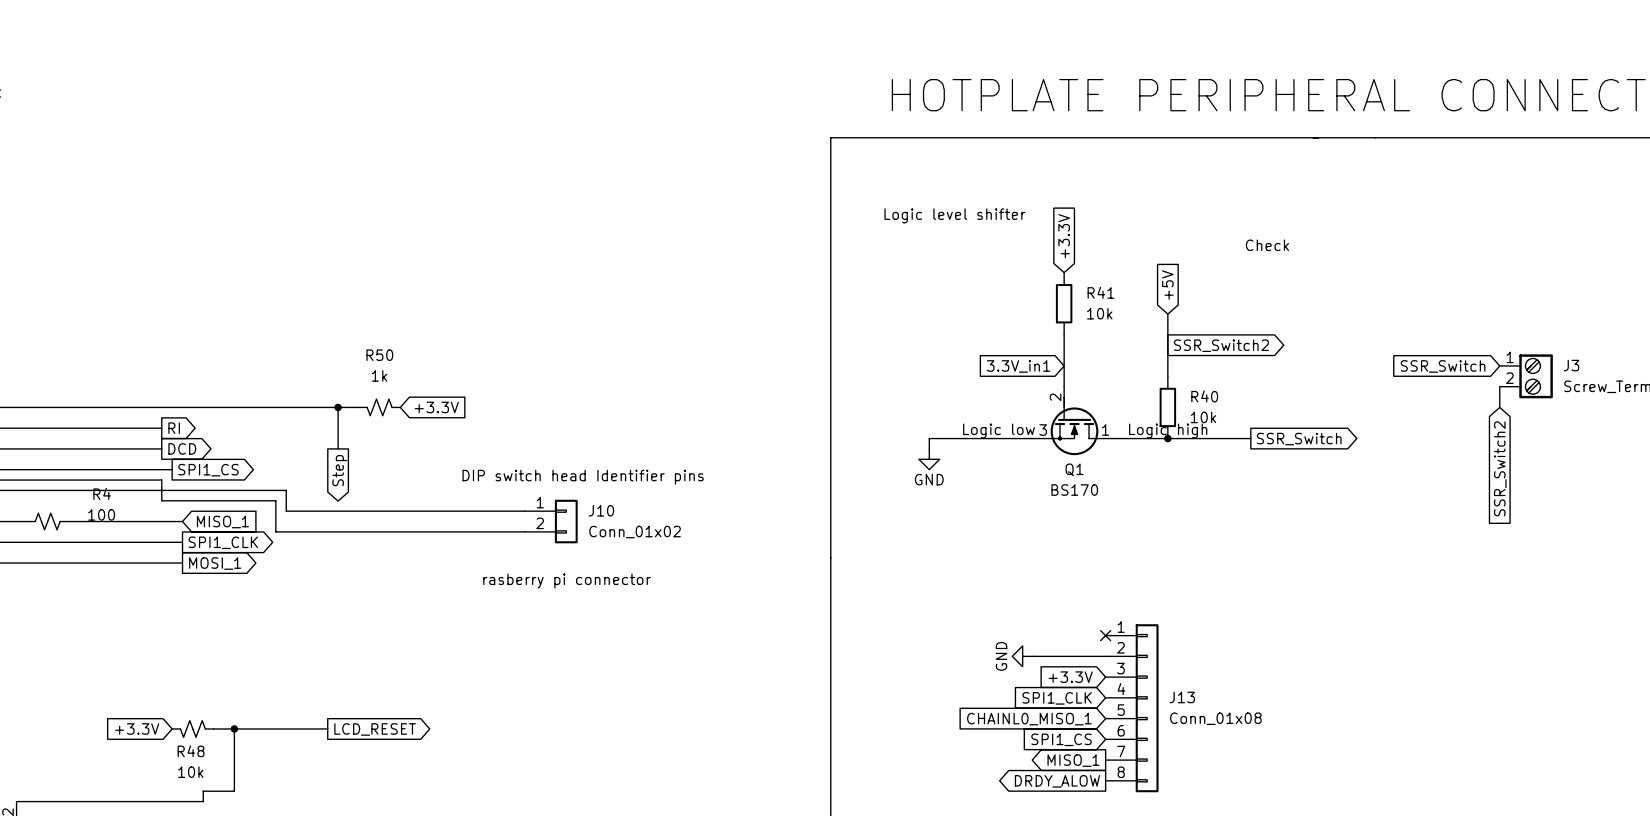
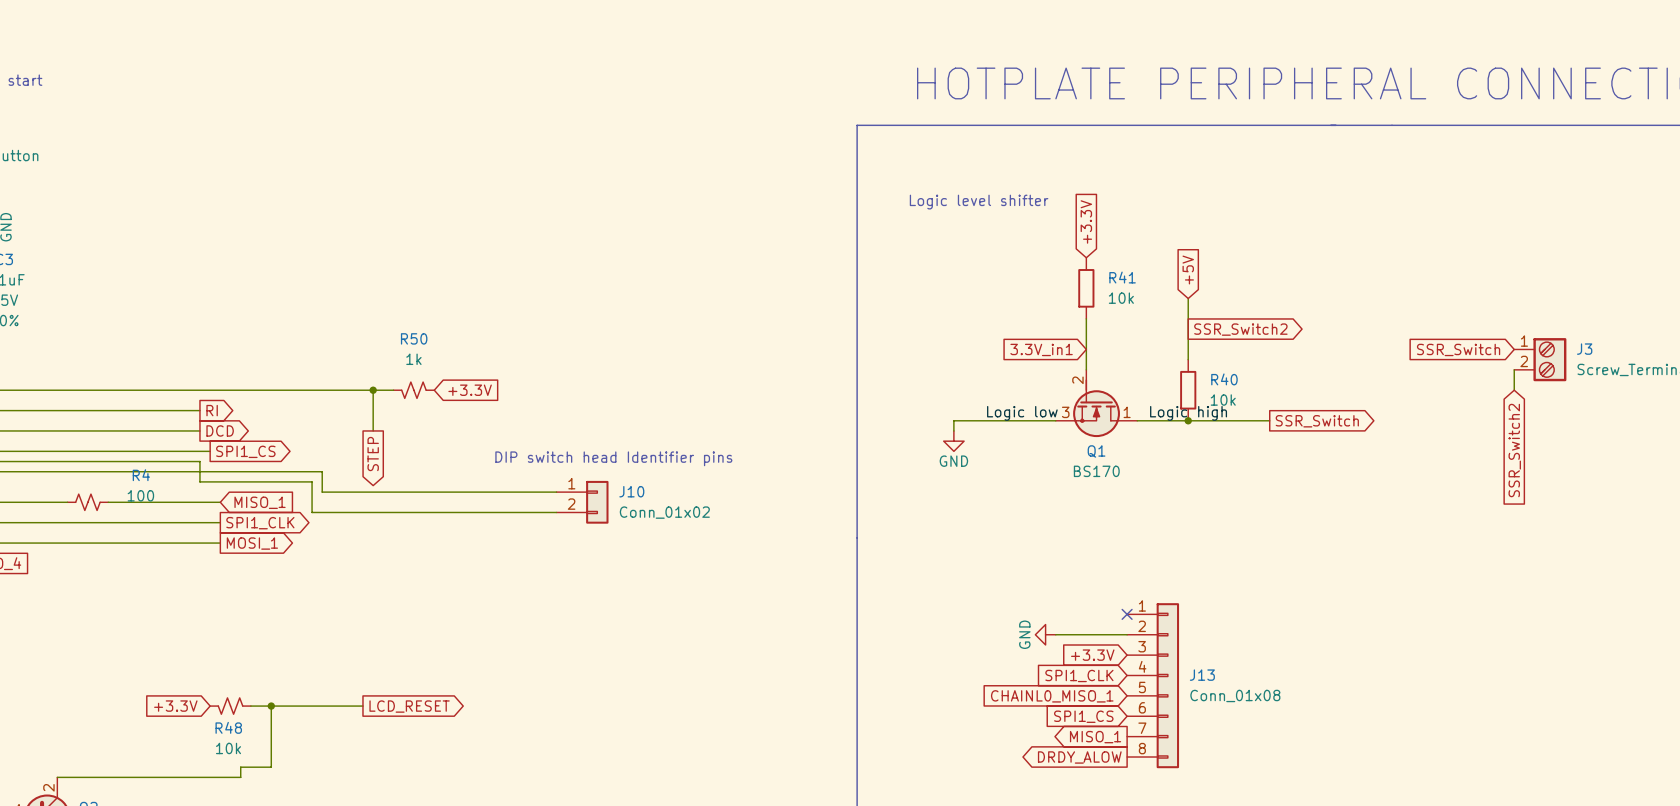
text: Check (1267, 245) -> none
global label: Step (339, 470) -> STEP (373, 454)
text: rasberry pi connector (567, 580) -> none

